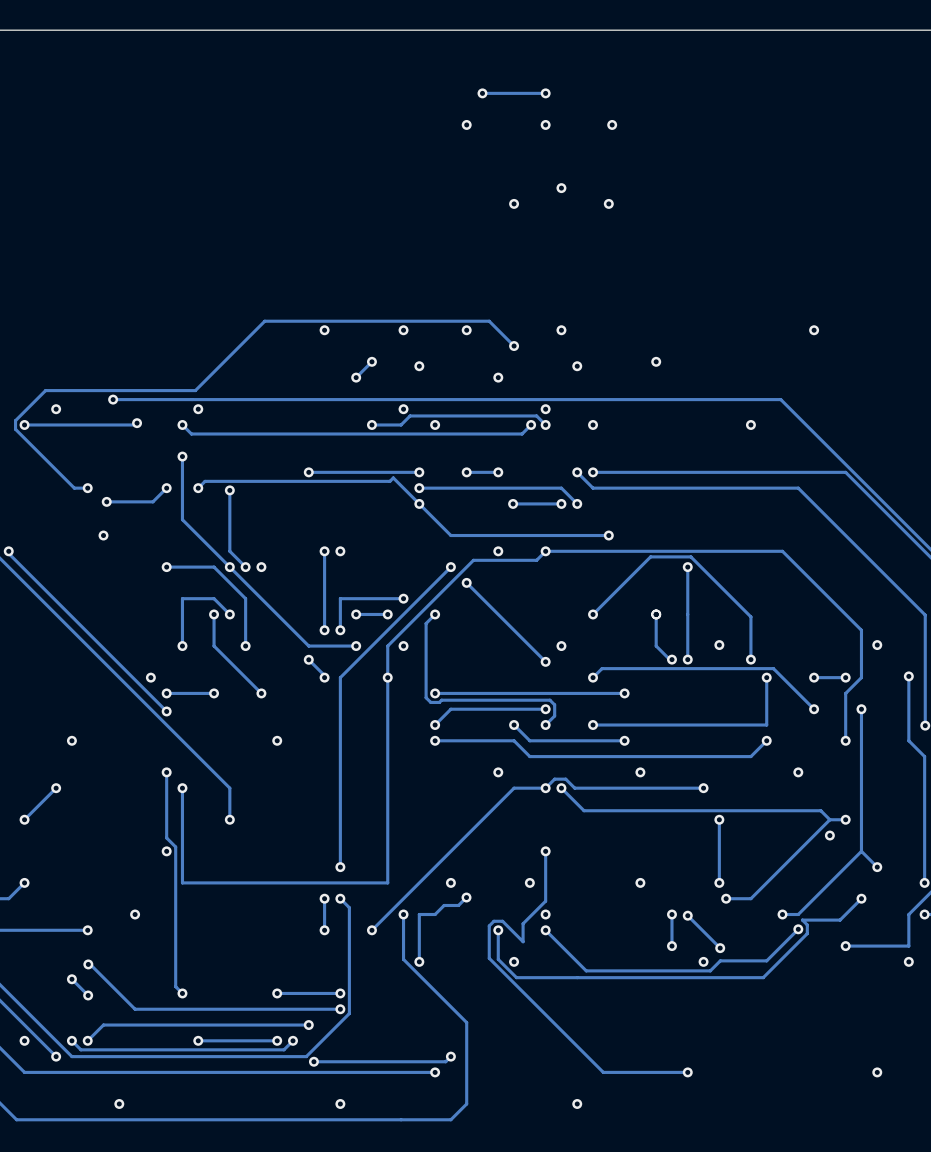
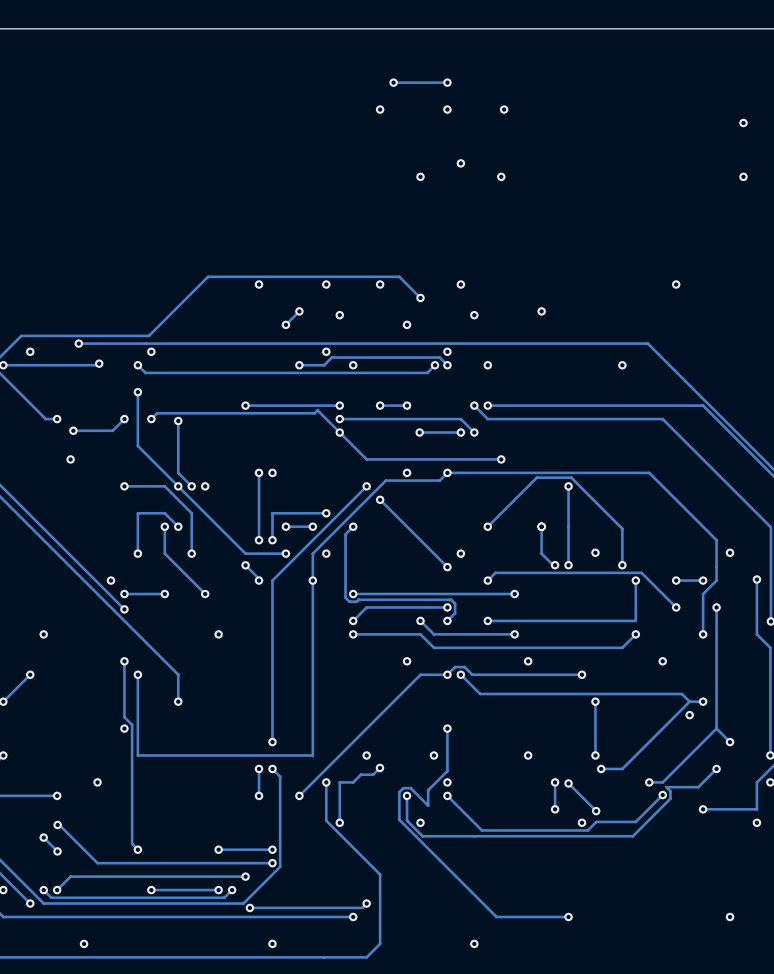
via: none -> (743, 123)
via: none -> (743, 176)

